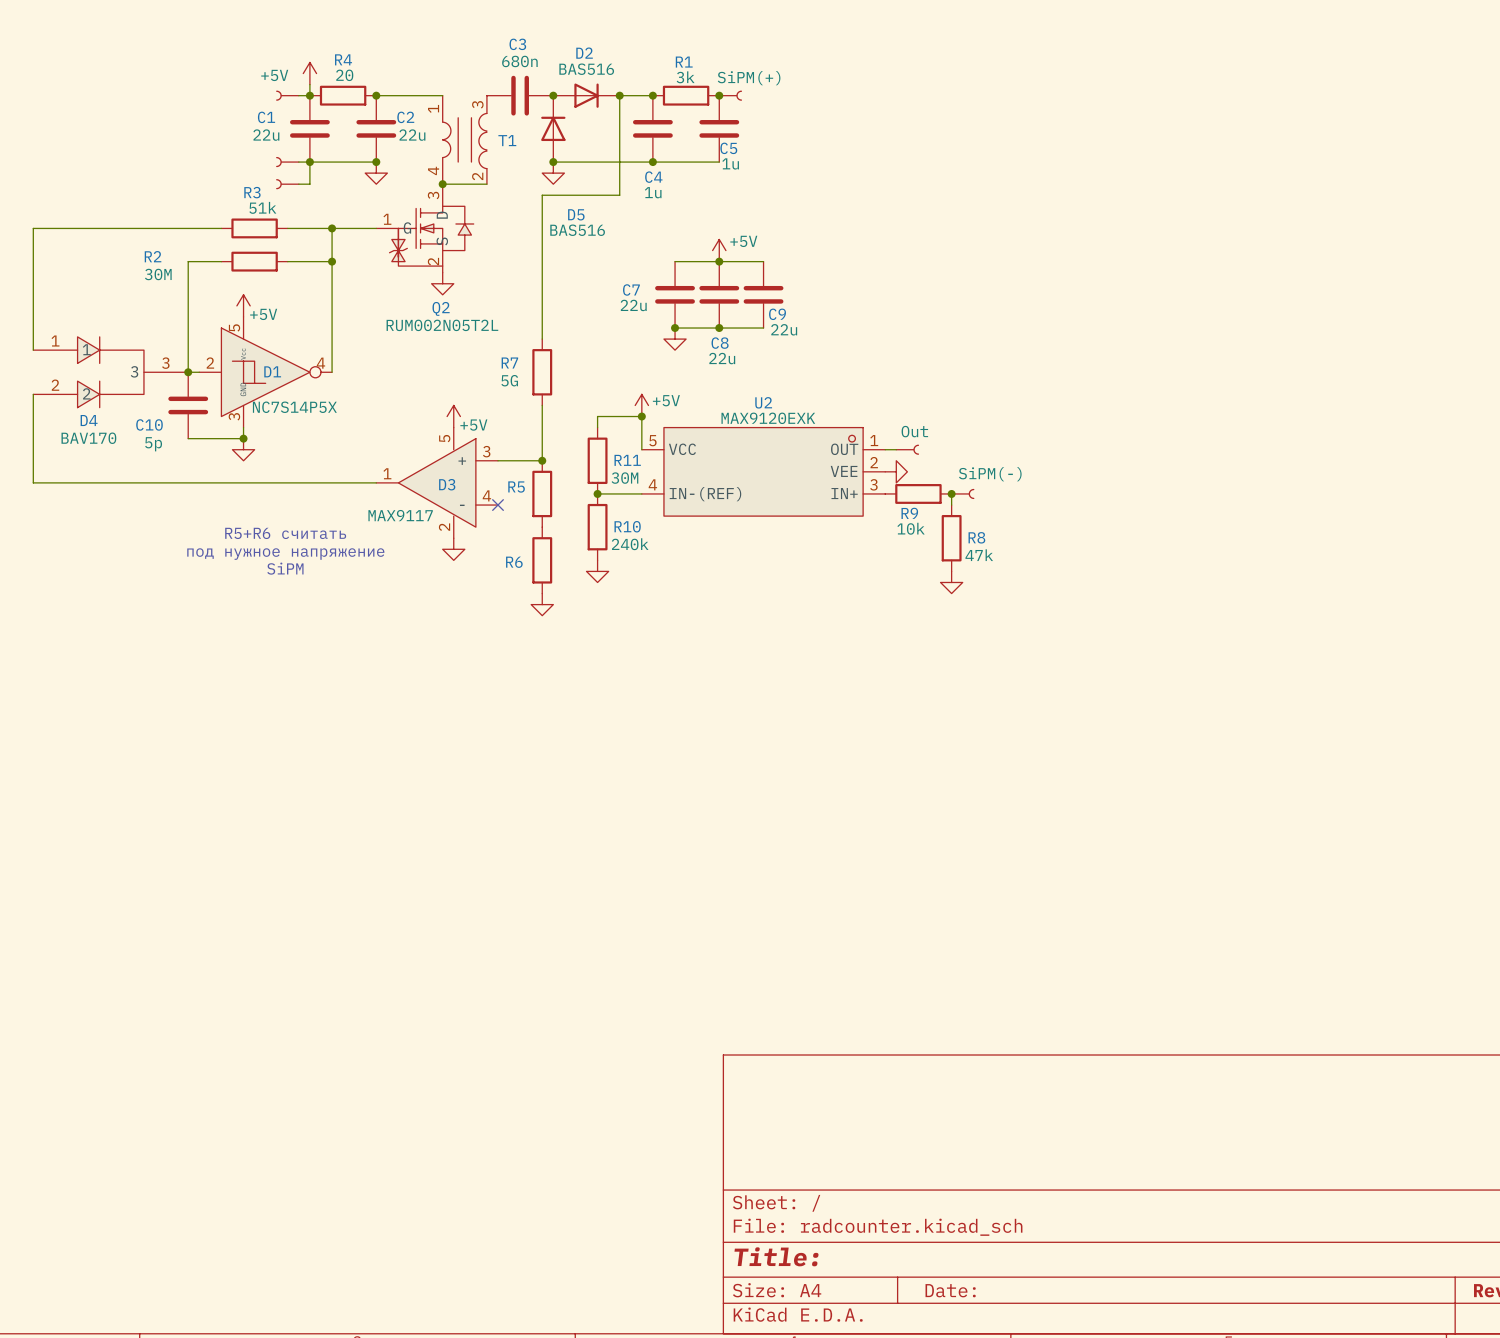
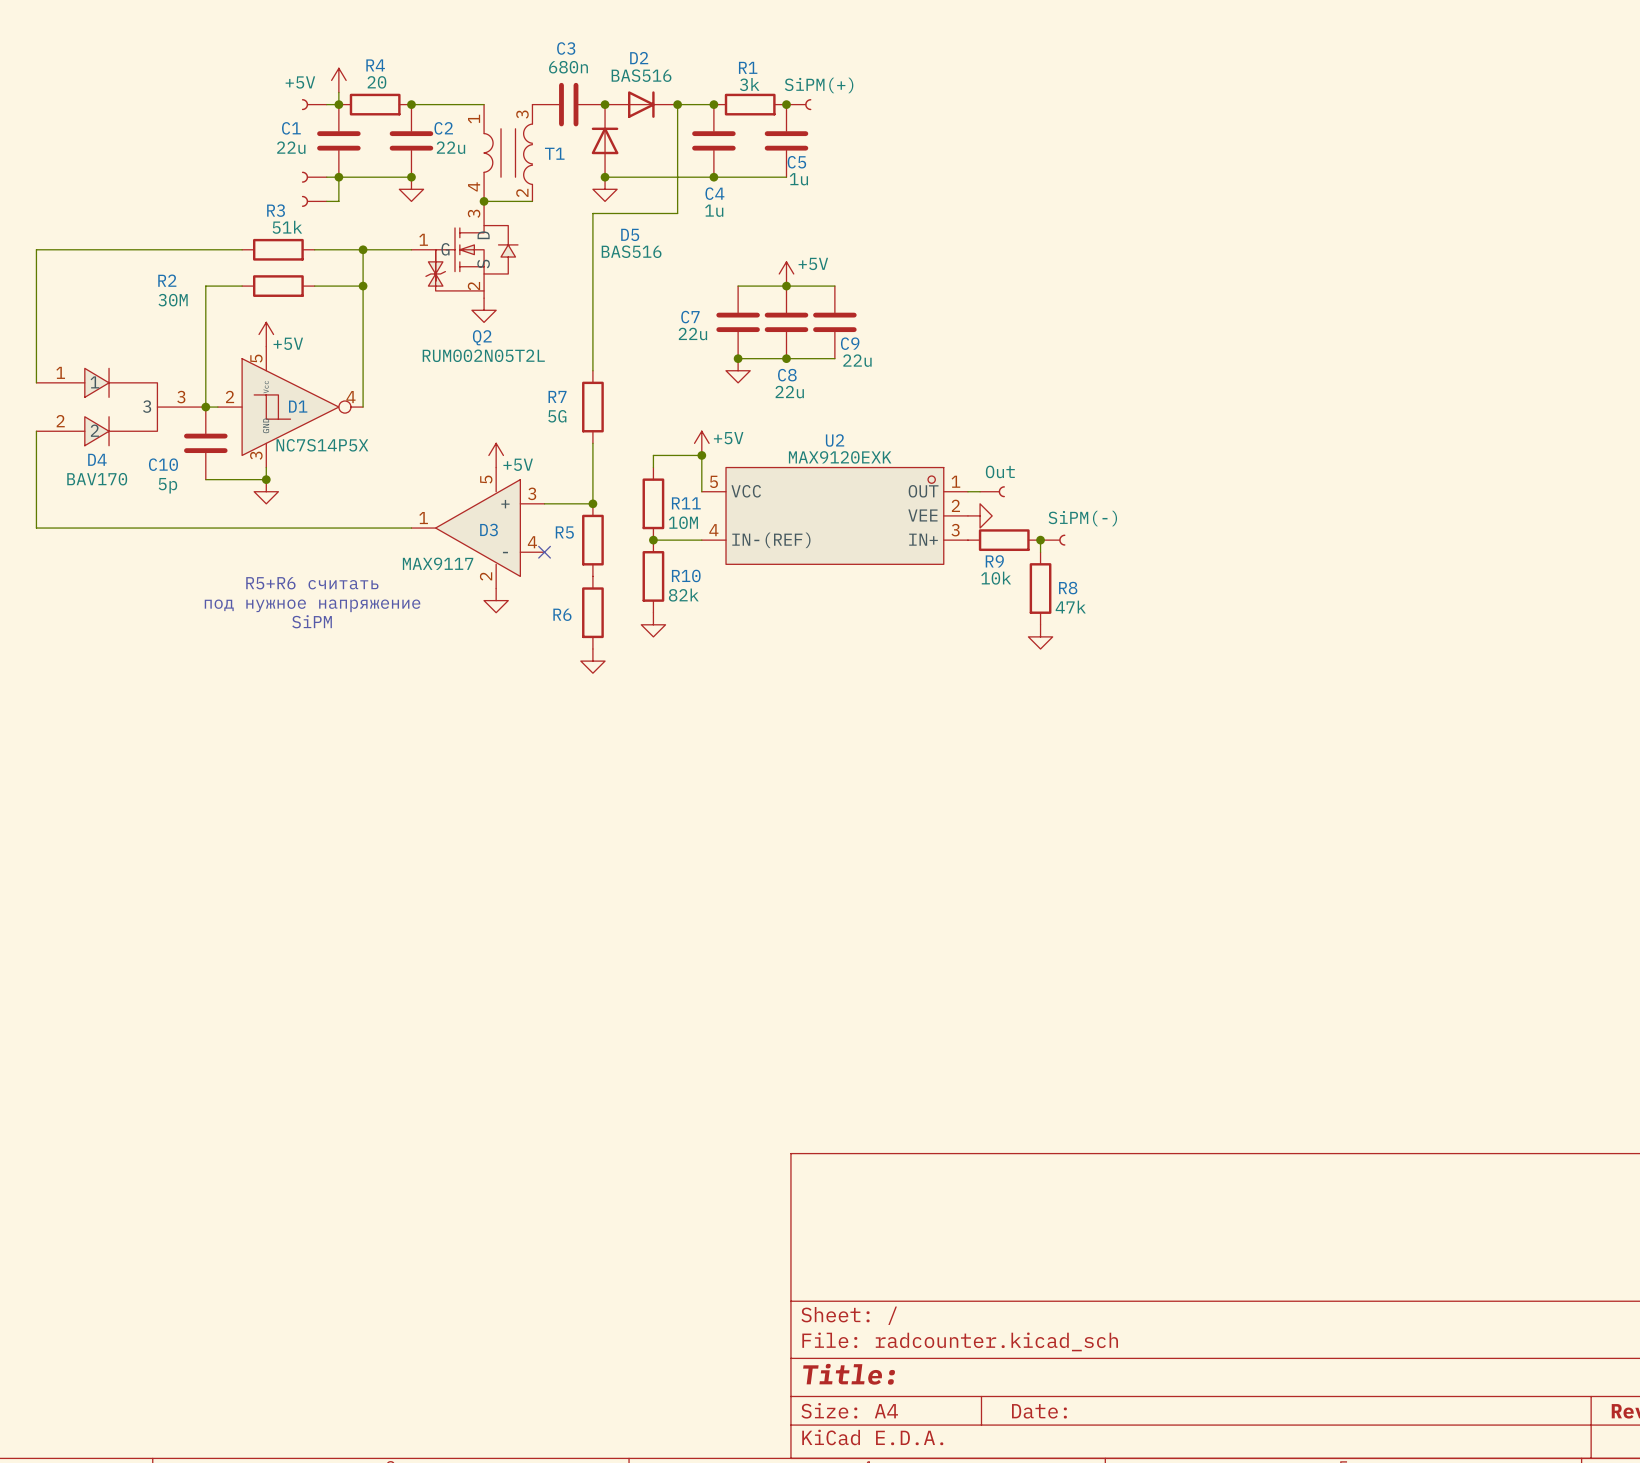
R11 value: 30M (624, 478) -> 10M (683, 522)
R10 value: 240k (630, 544) -> 82k (683, 595)

